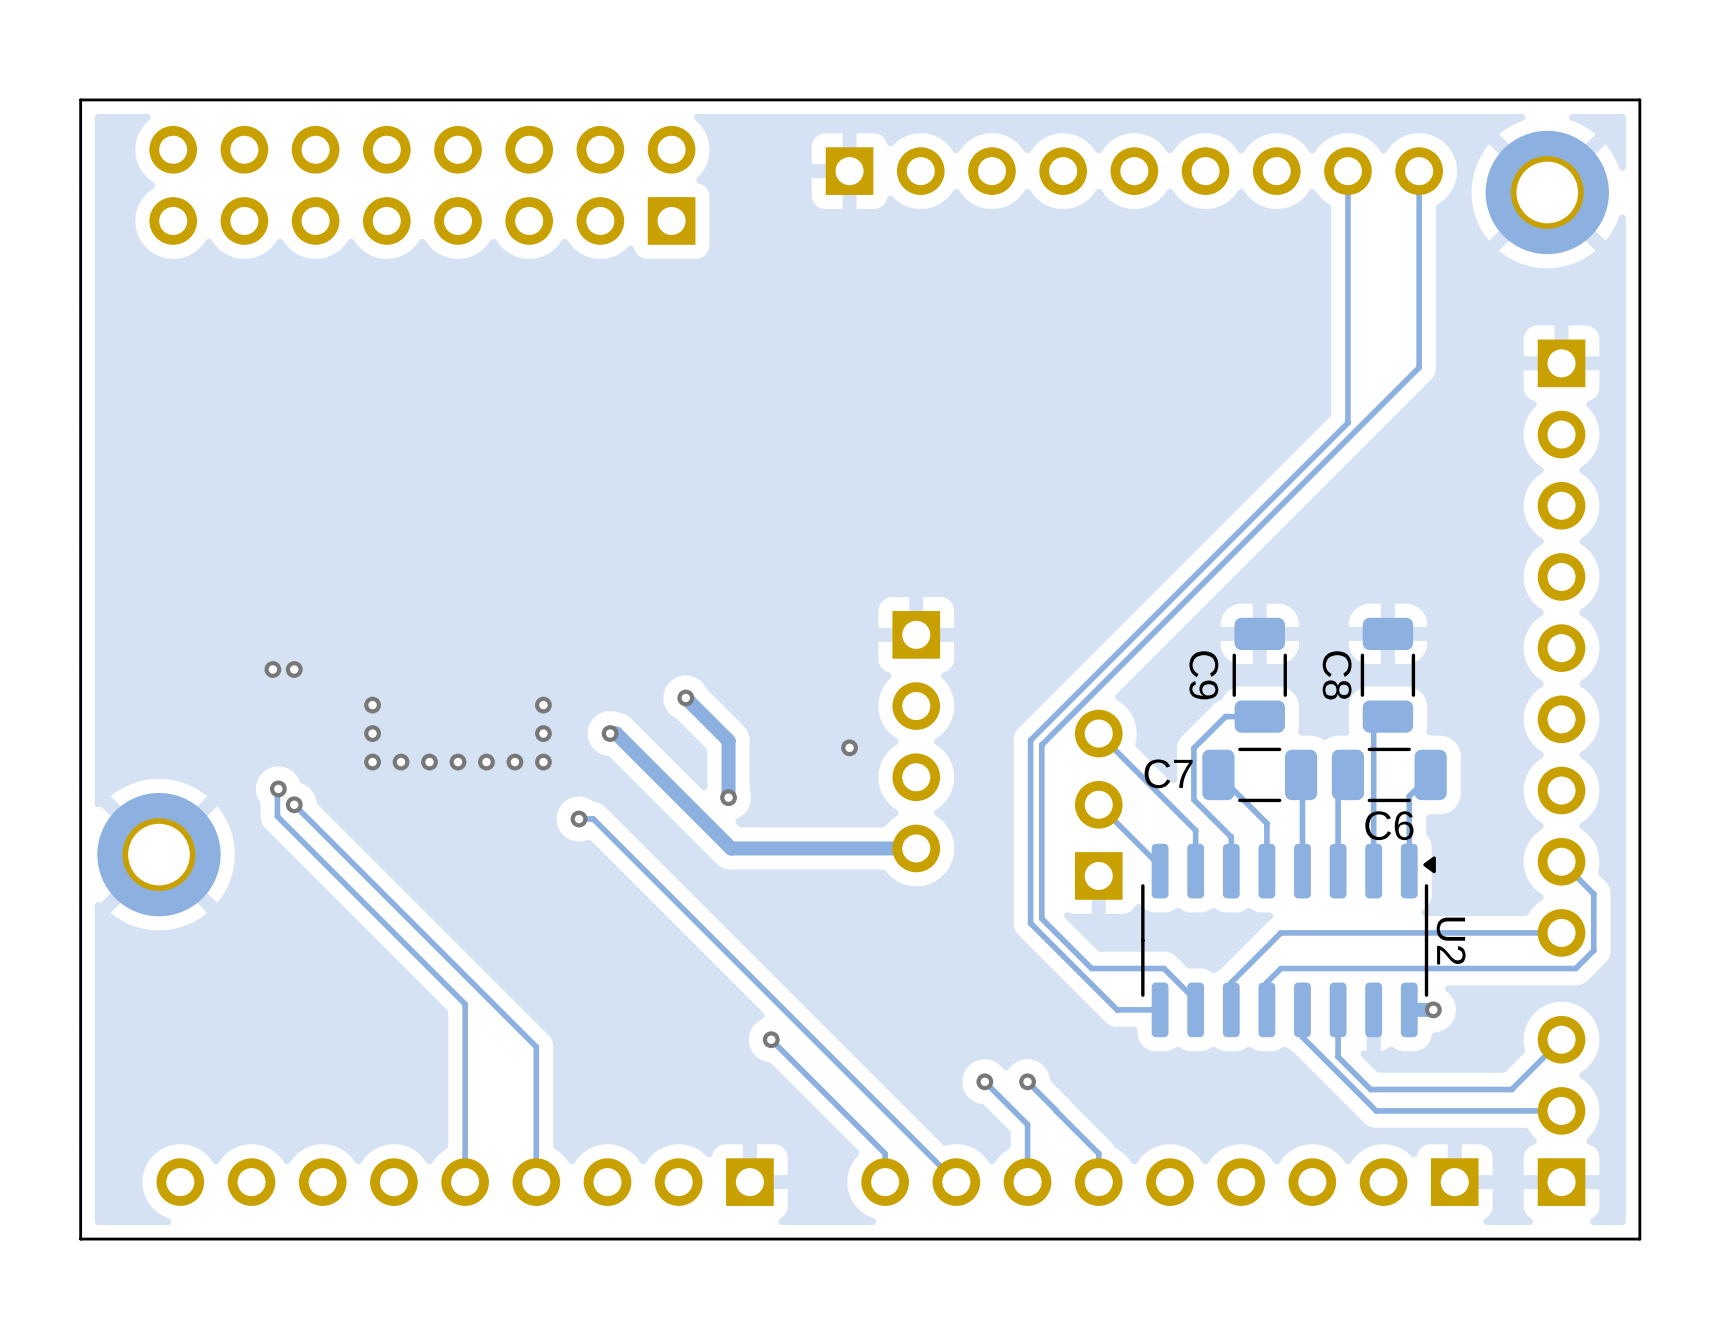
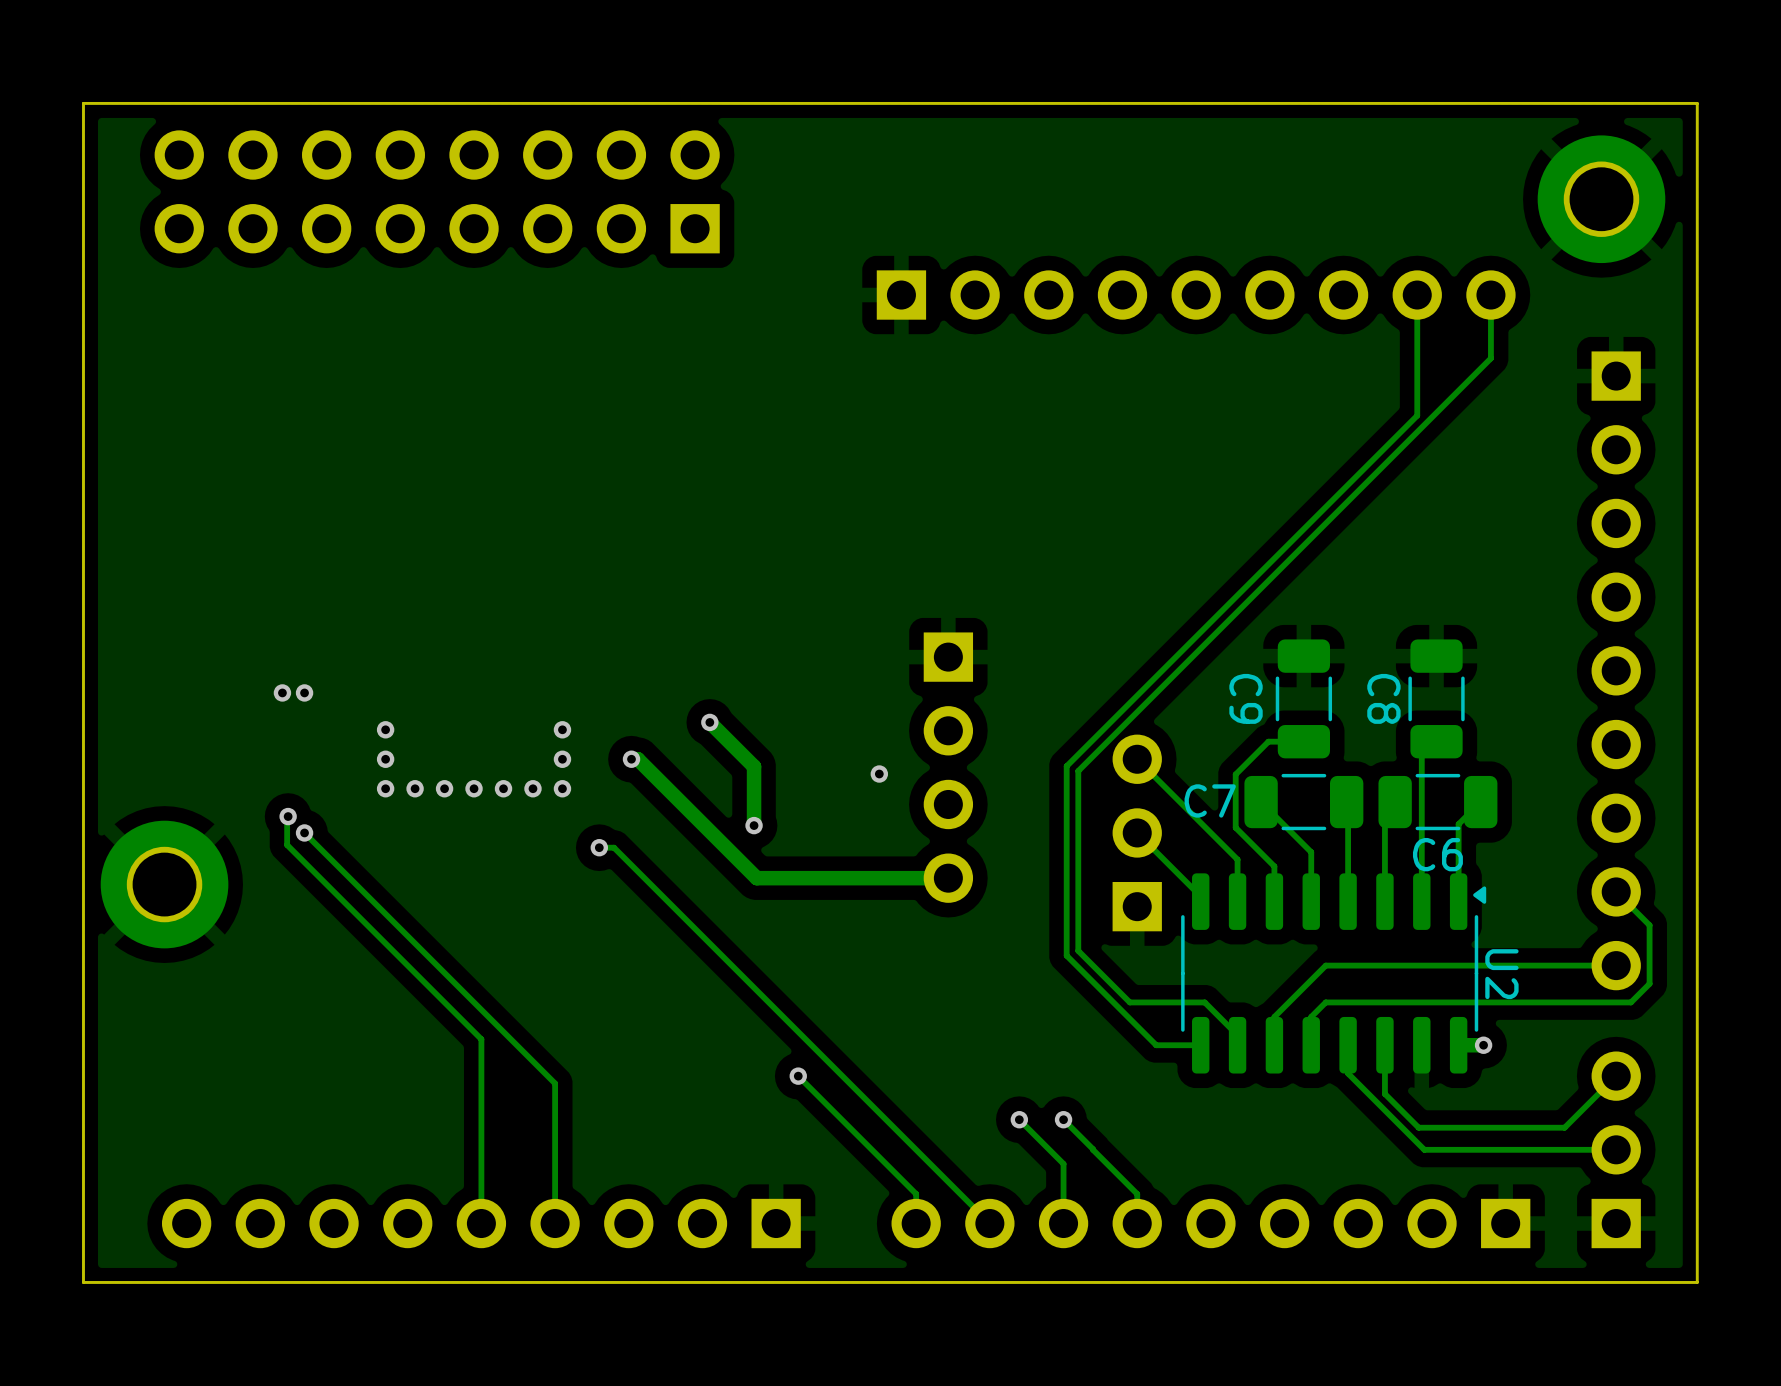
part position: (1134, 171) -> (1196, 295)
track: (1347, 171) (1347, 422) -> (1417, 295) (1417, 415) (1395, 437)
track: (1419, 171) (1419, 367) -> (1490, 295) (1490, 358) (1468, 380)

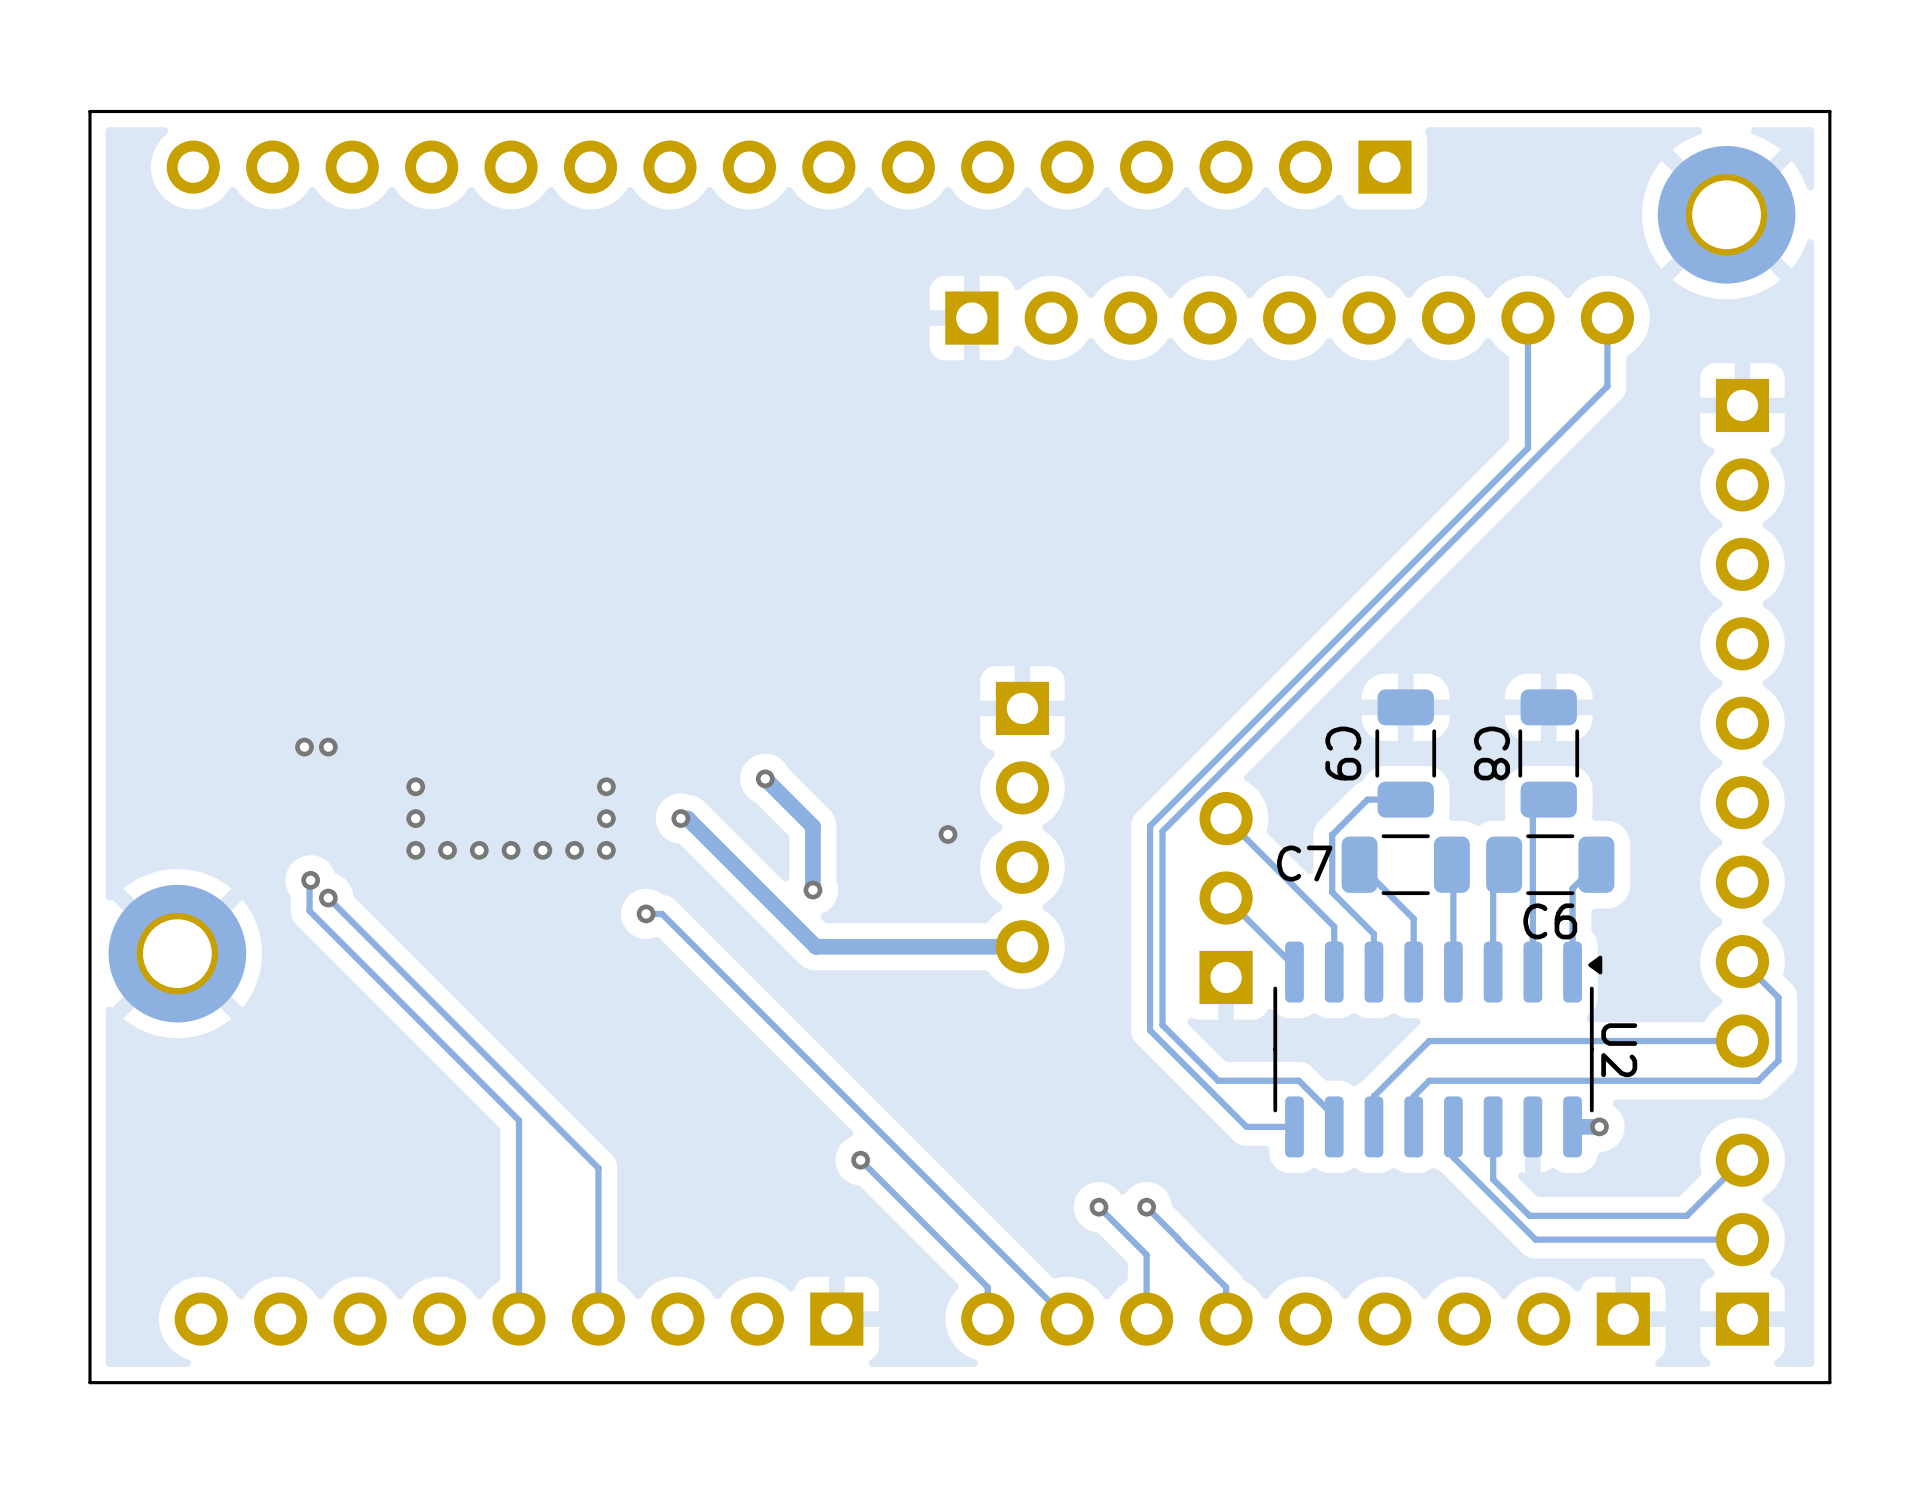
part: none -> (789, 167)
part: (437, 191) -> none

